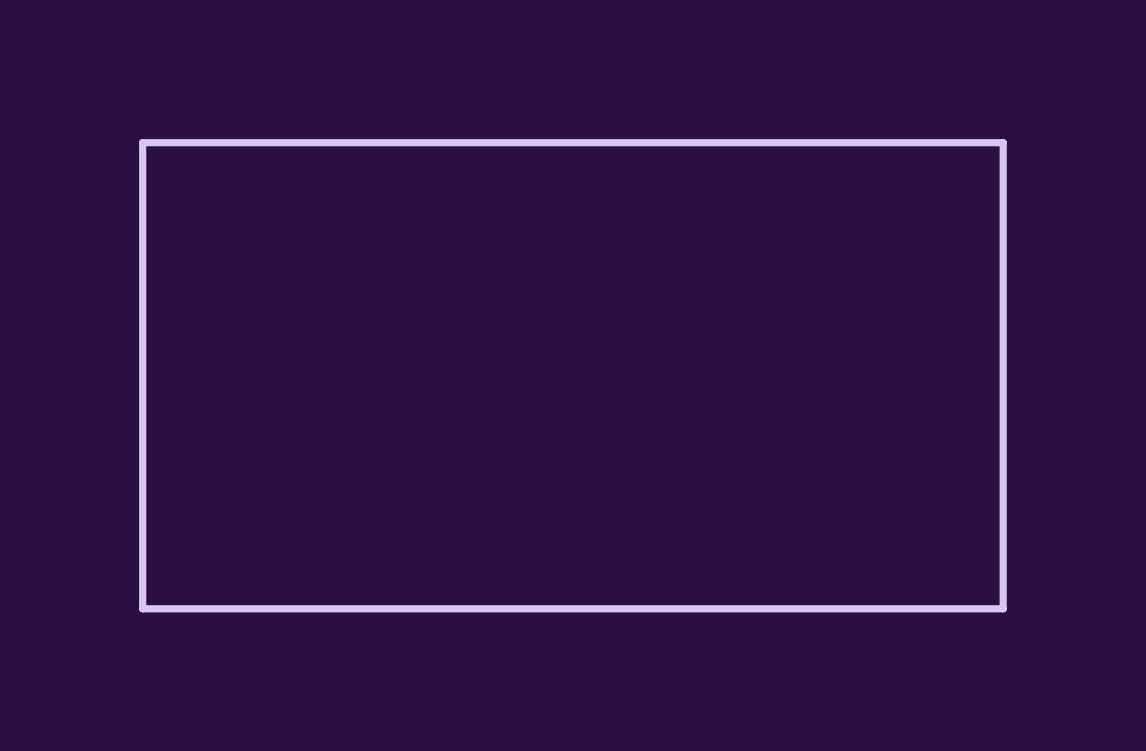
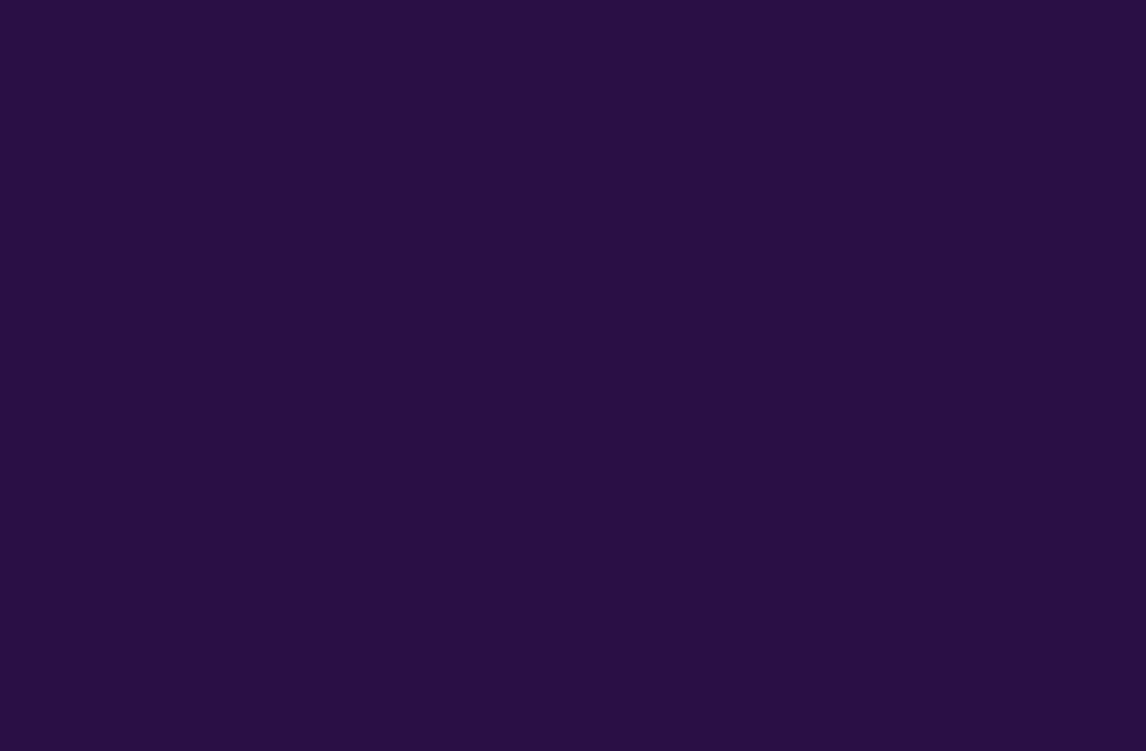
board edge: (1003, 142) (142, 142) (142, 608) (1003, 608) (1003, 142) -> none

